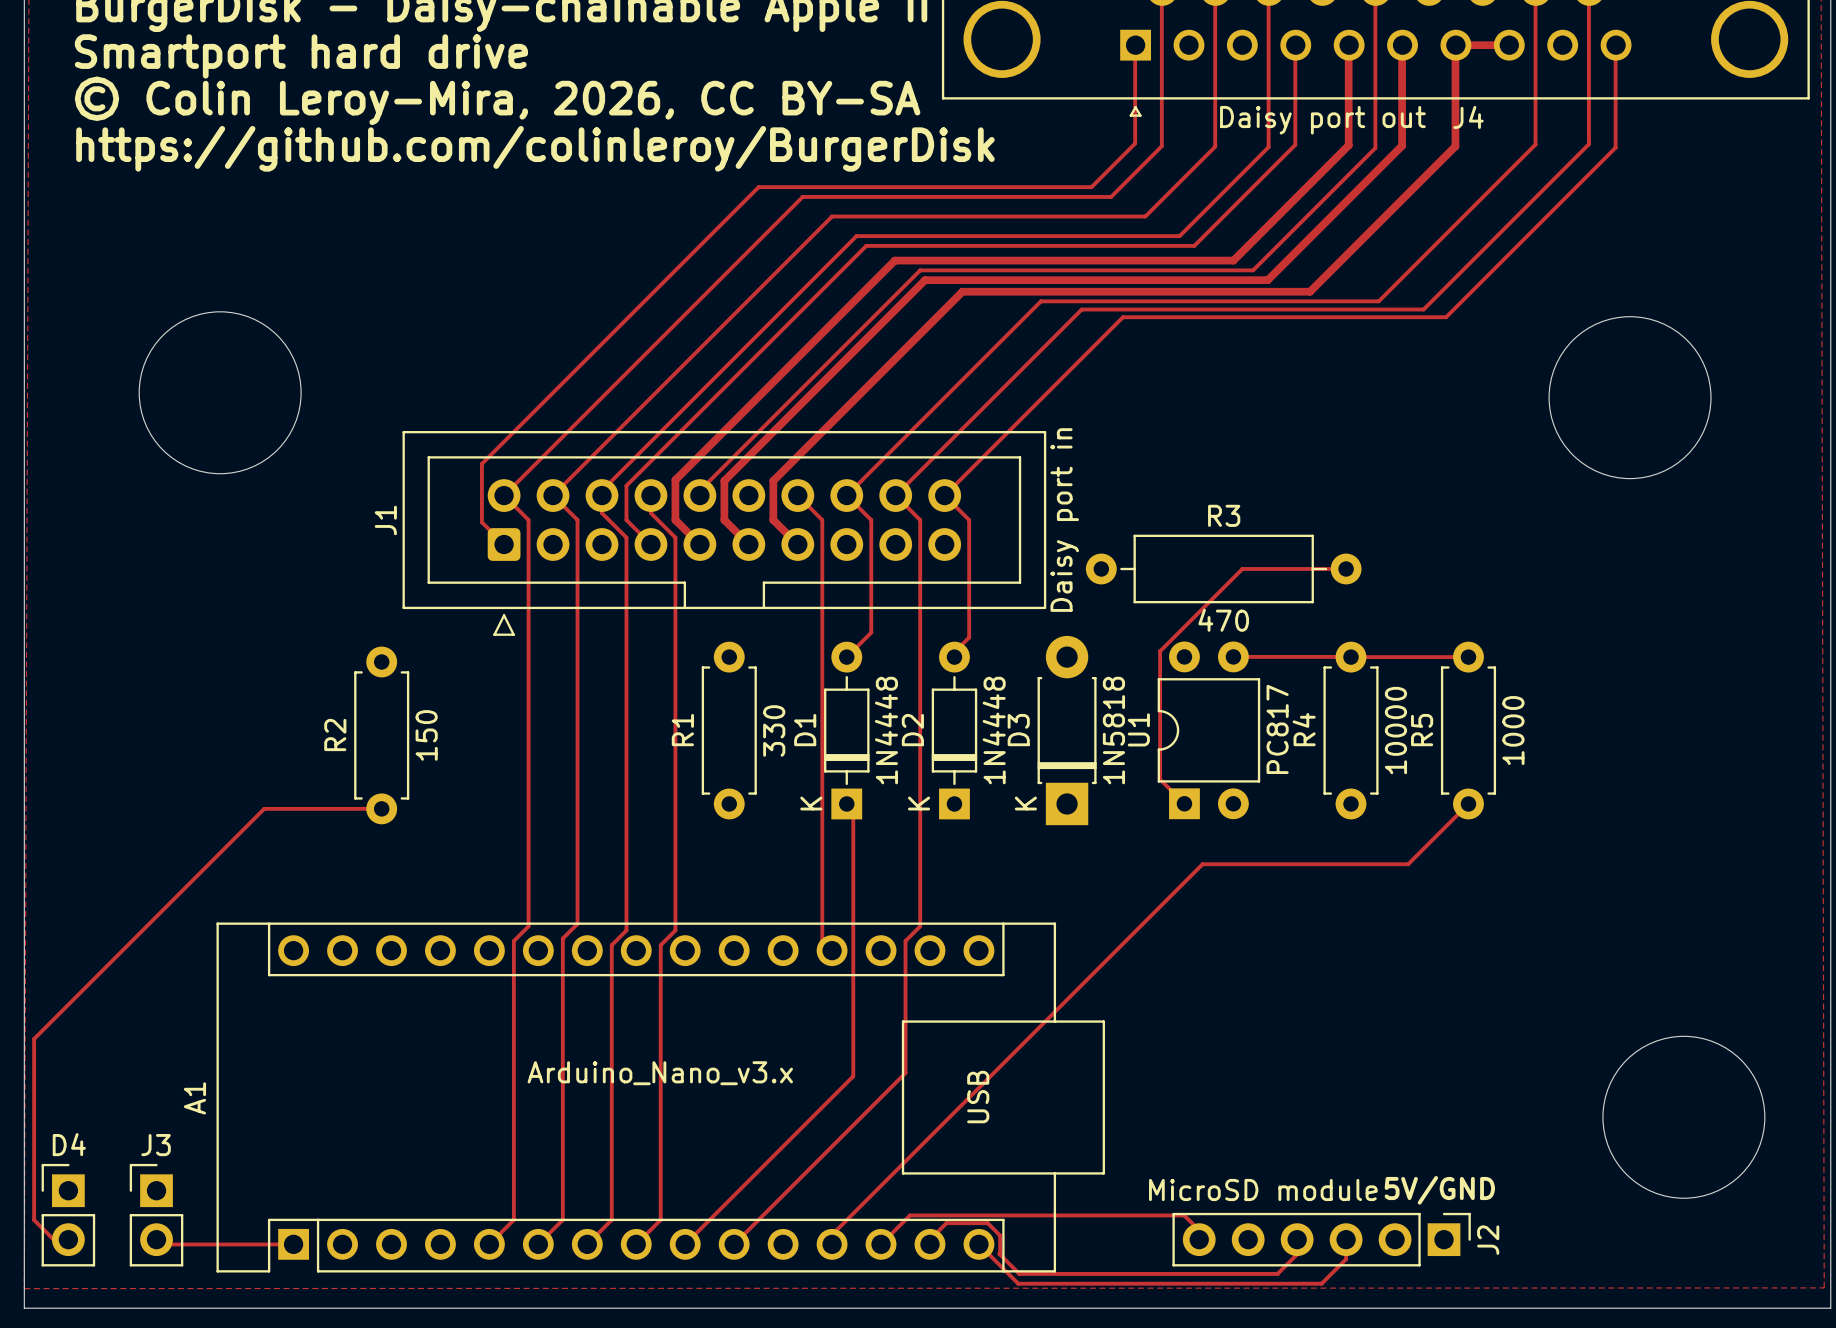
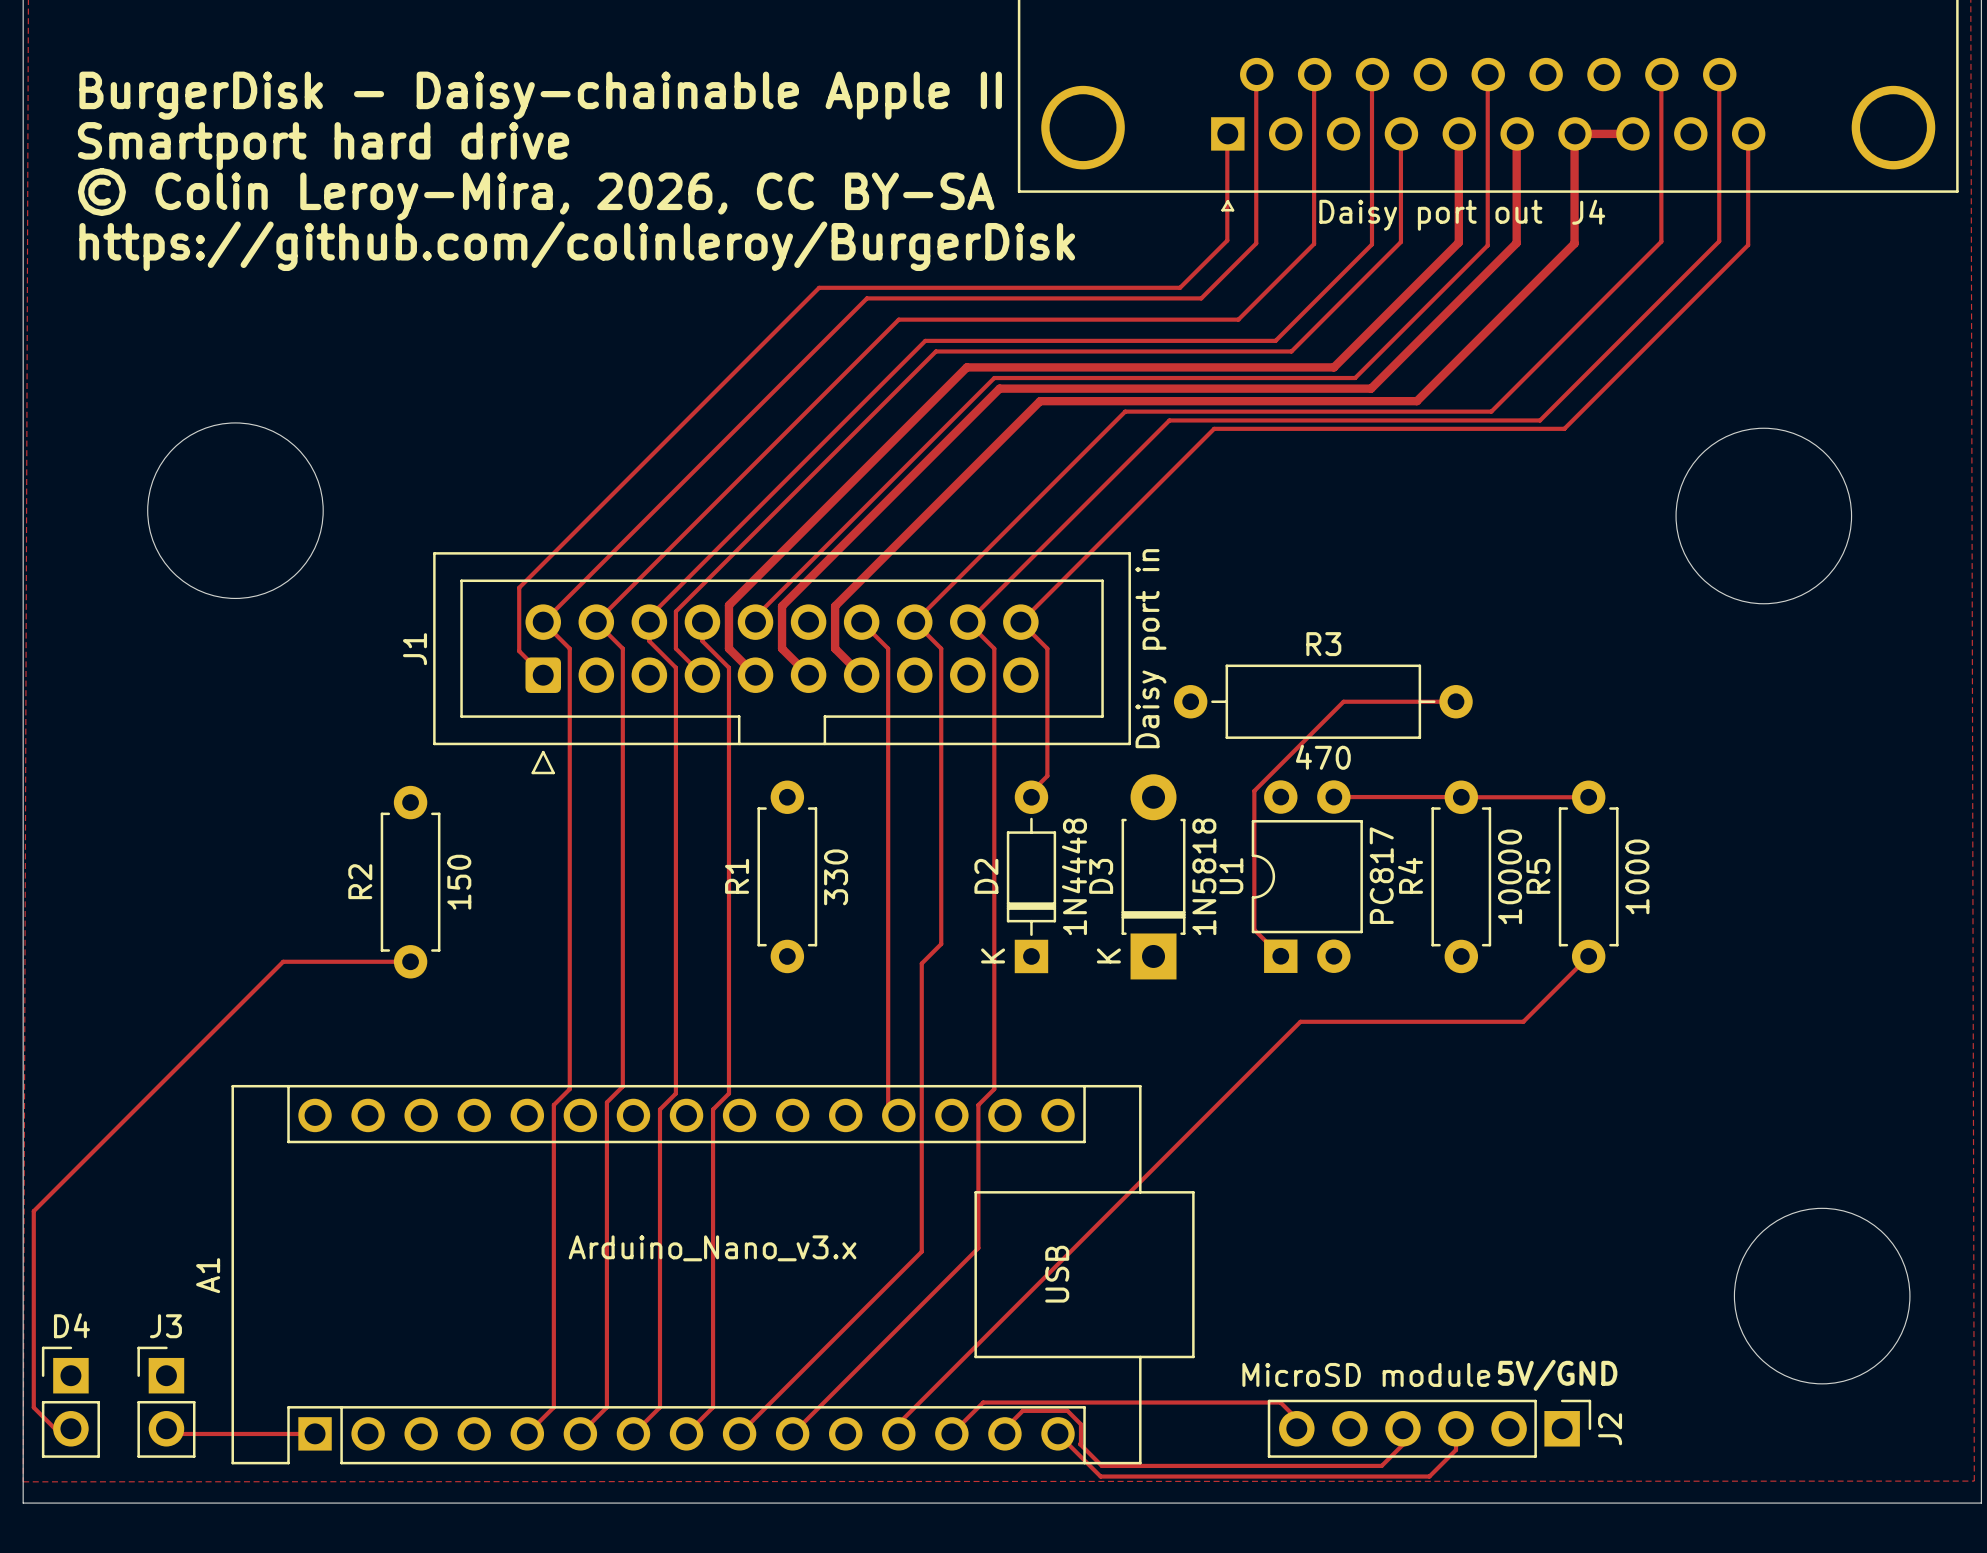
track: (871, 632) (846, 657) -> (941, 770) (941, 944) (921, 963)
D1: 1N4448 (846, 730) -> none

